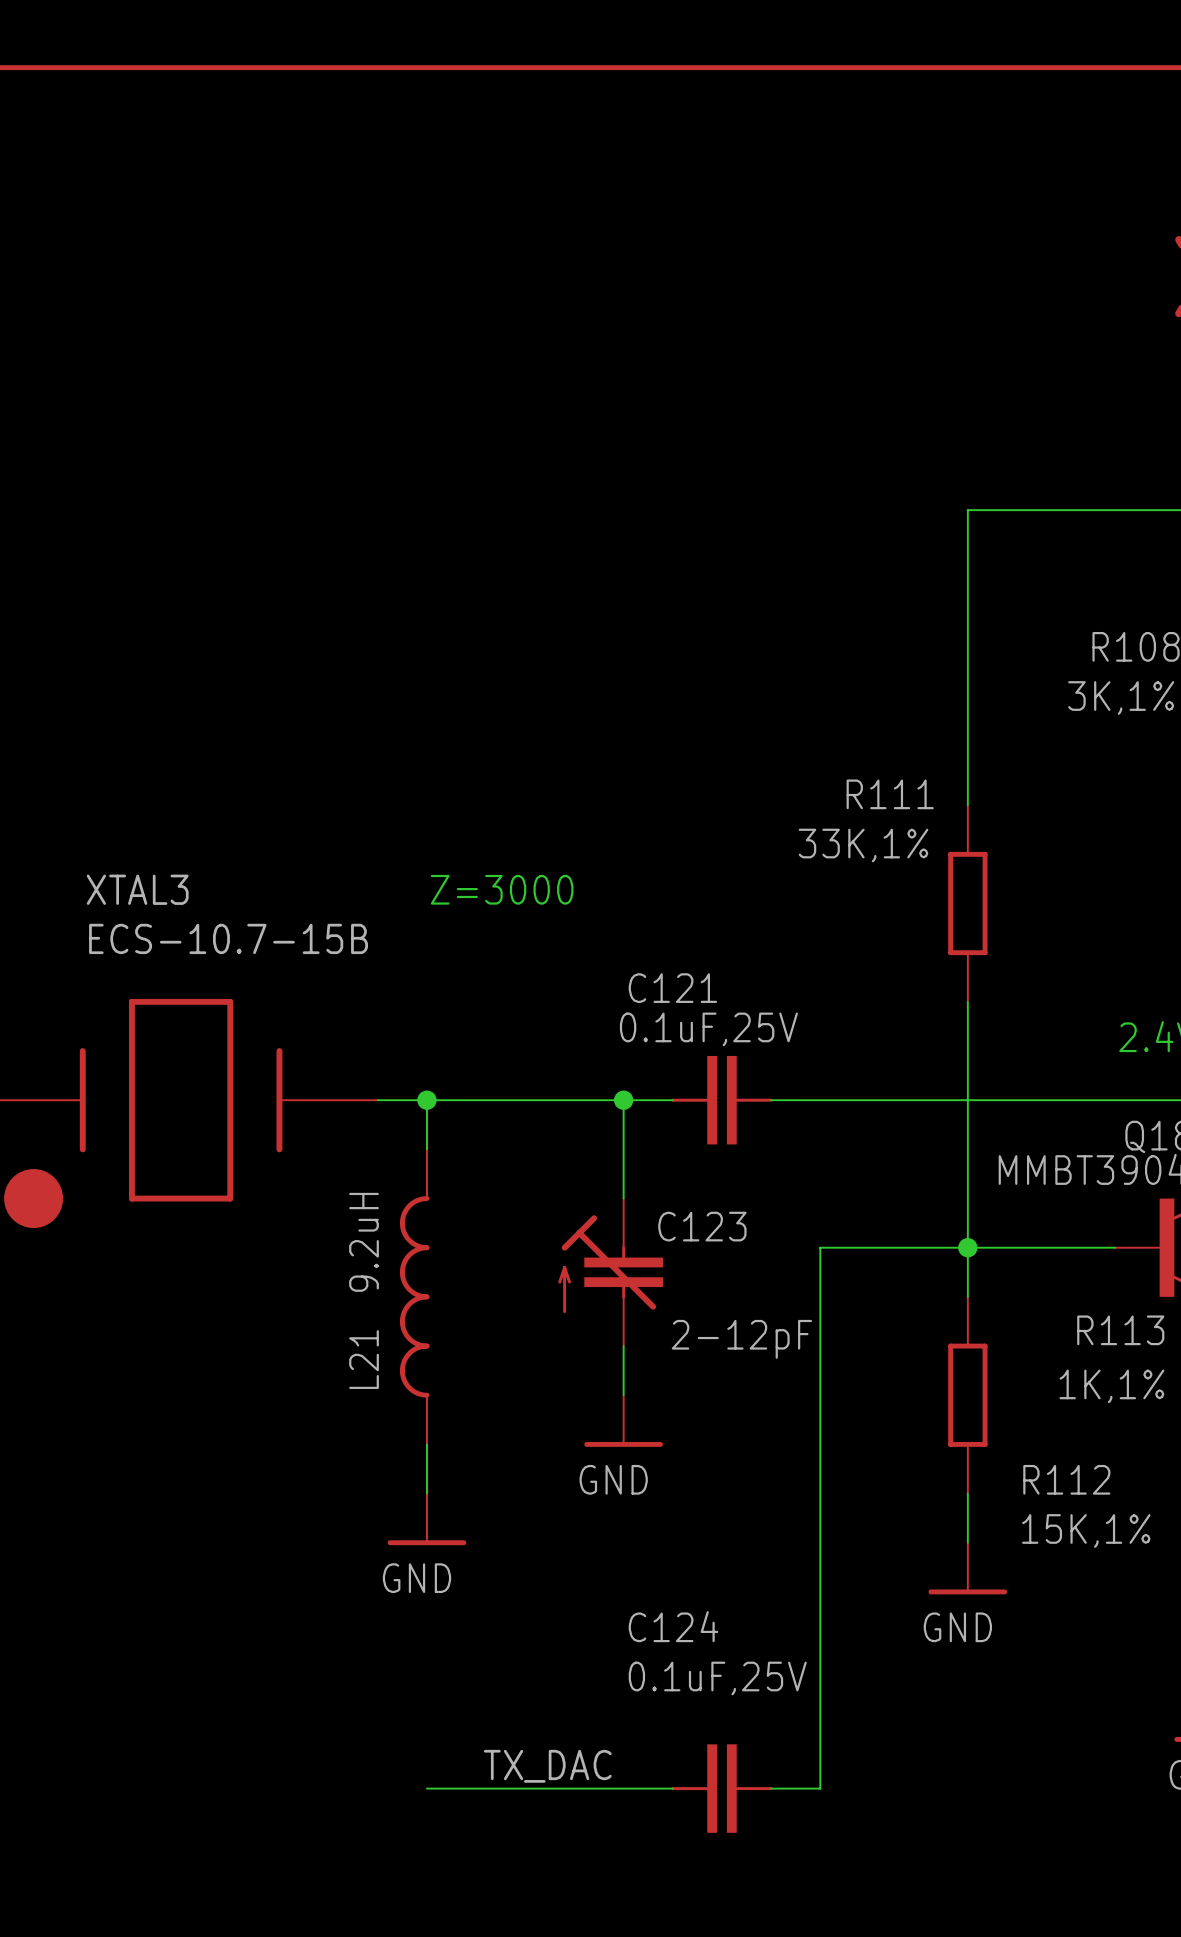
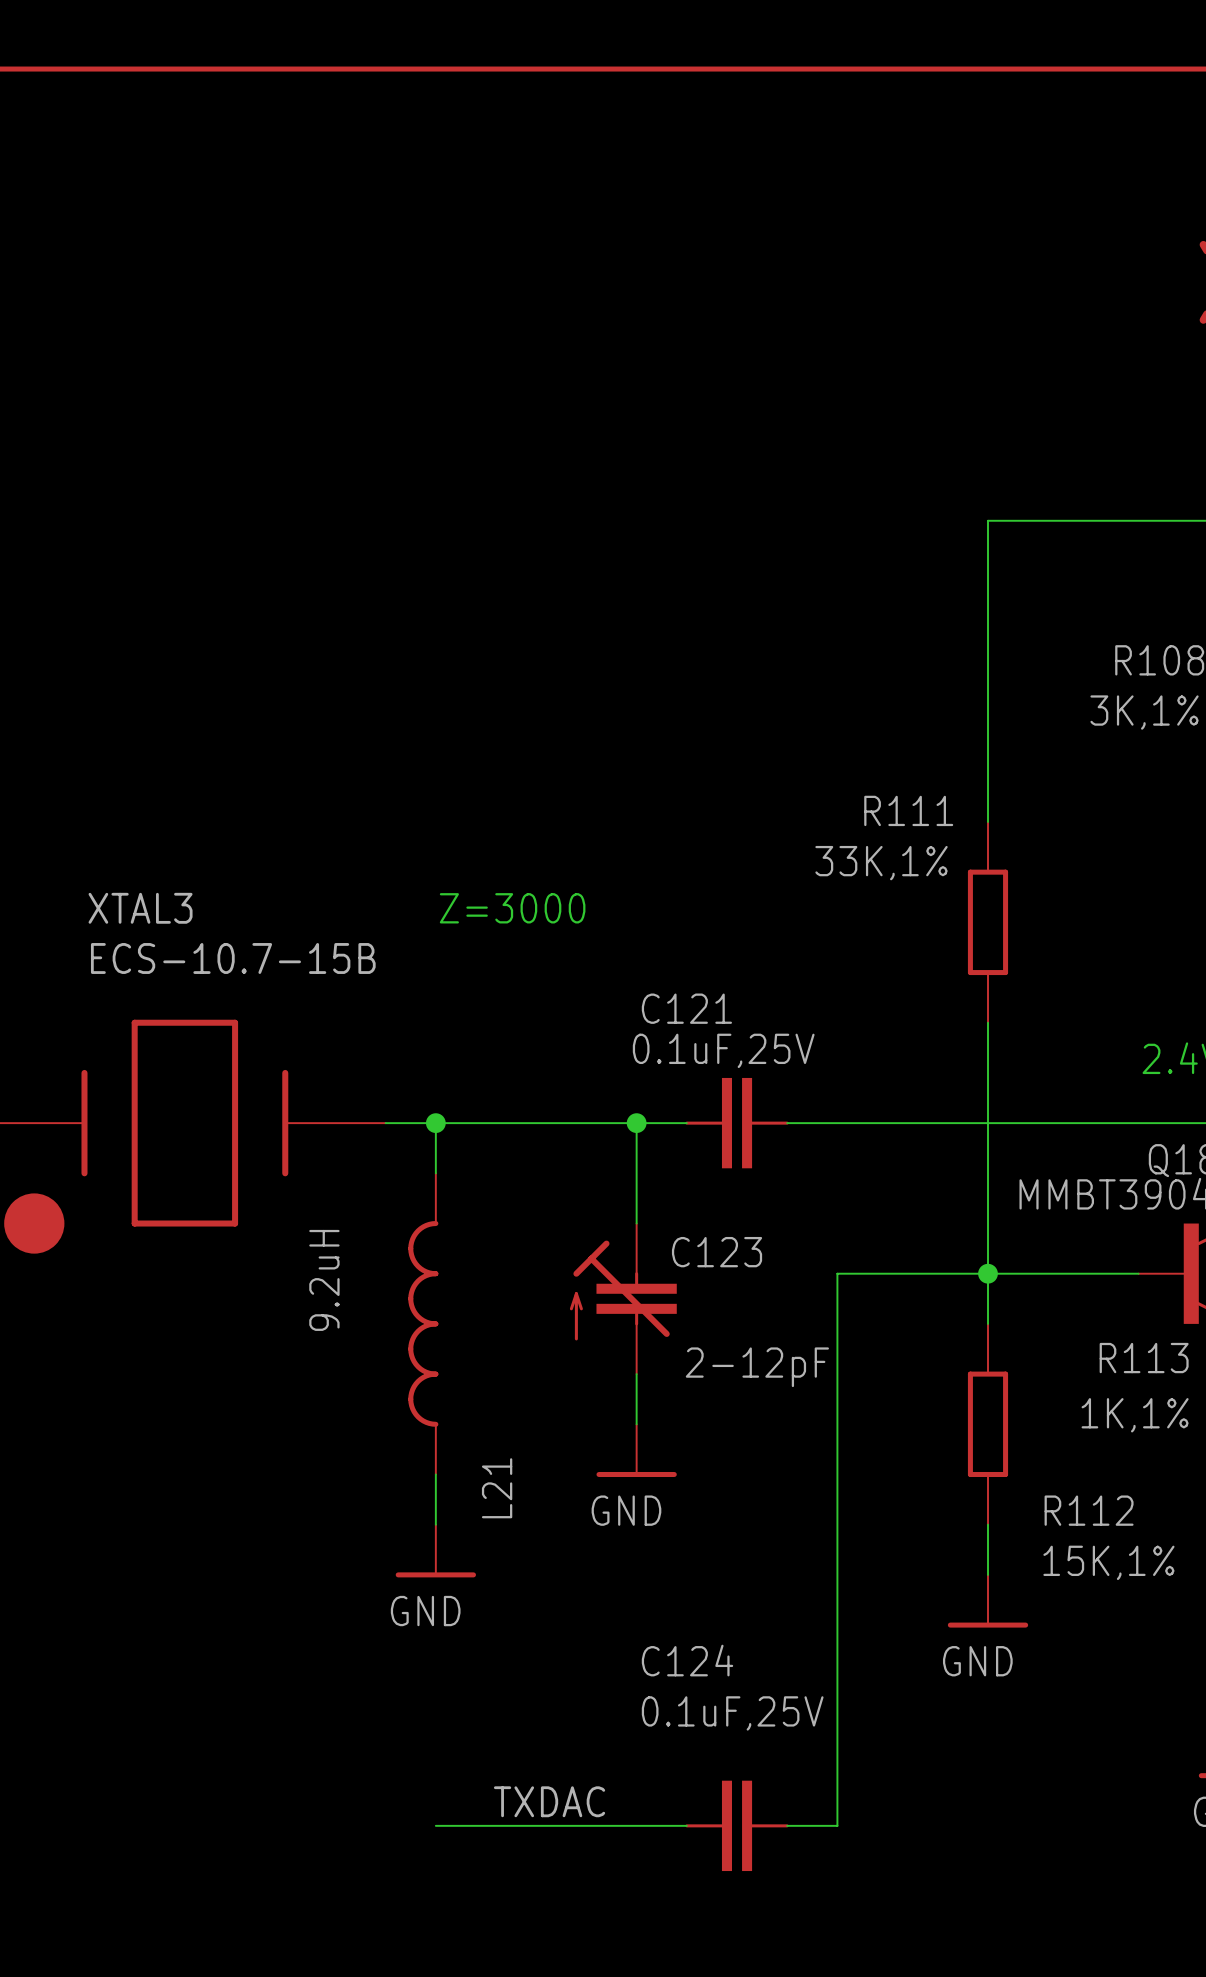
L21 value position: 9.2uH (364, 1242) -> 9.2uH (324, 1280)
L21 name position: L21 (364, 1359) -> L21 (497, 1488)
label: TX_DAC (547, 1766) -> TXDAC (549, 1801)

